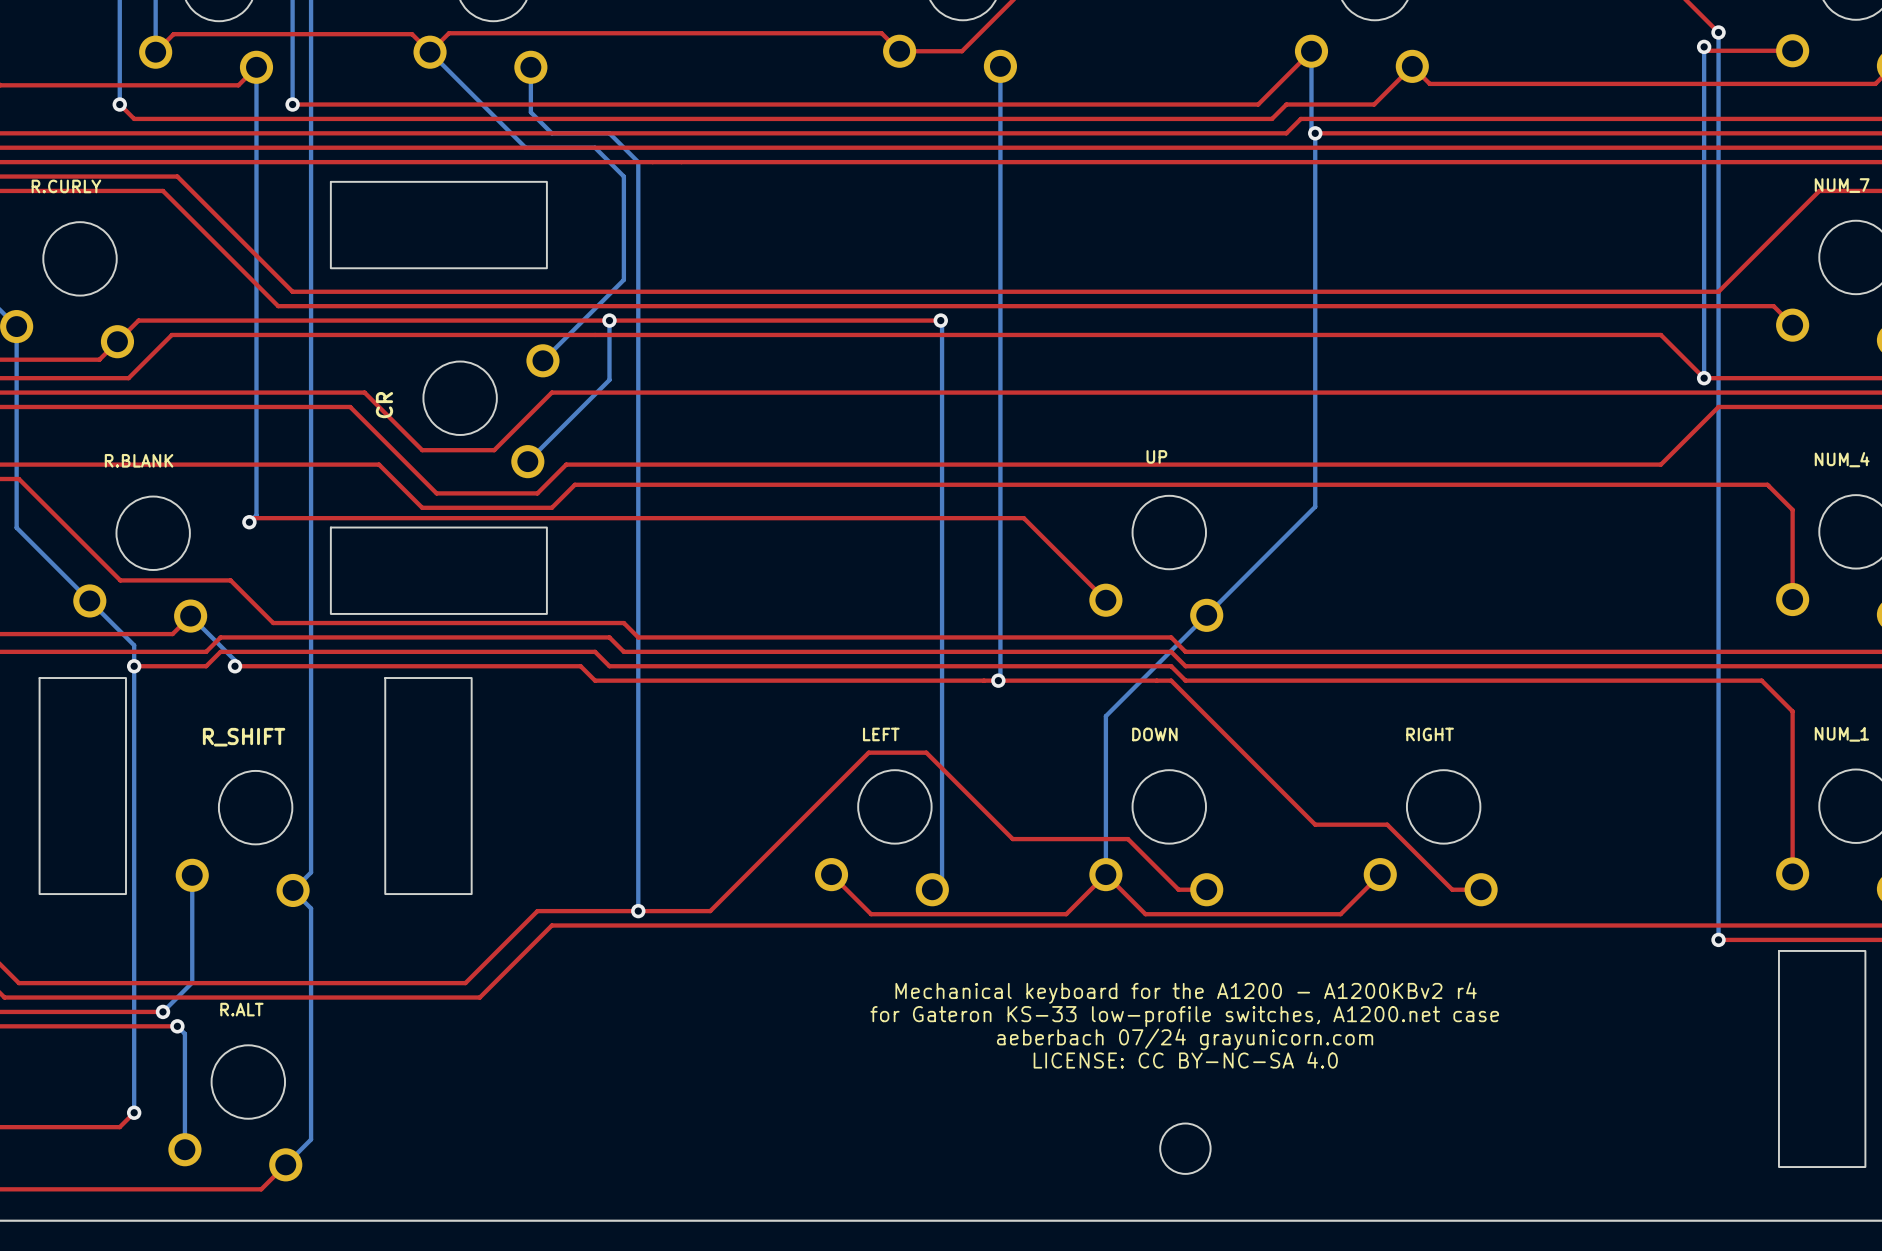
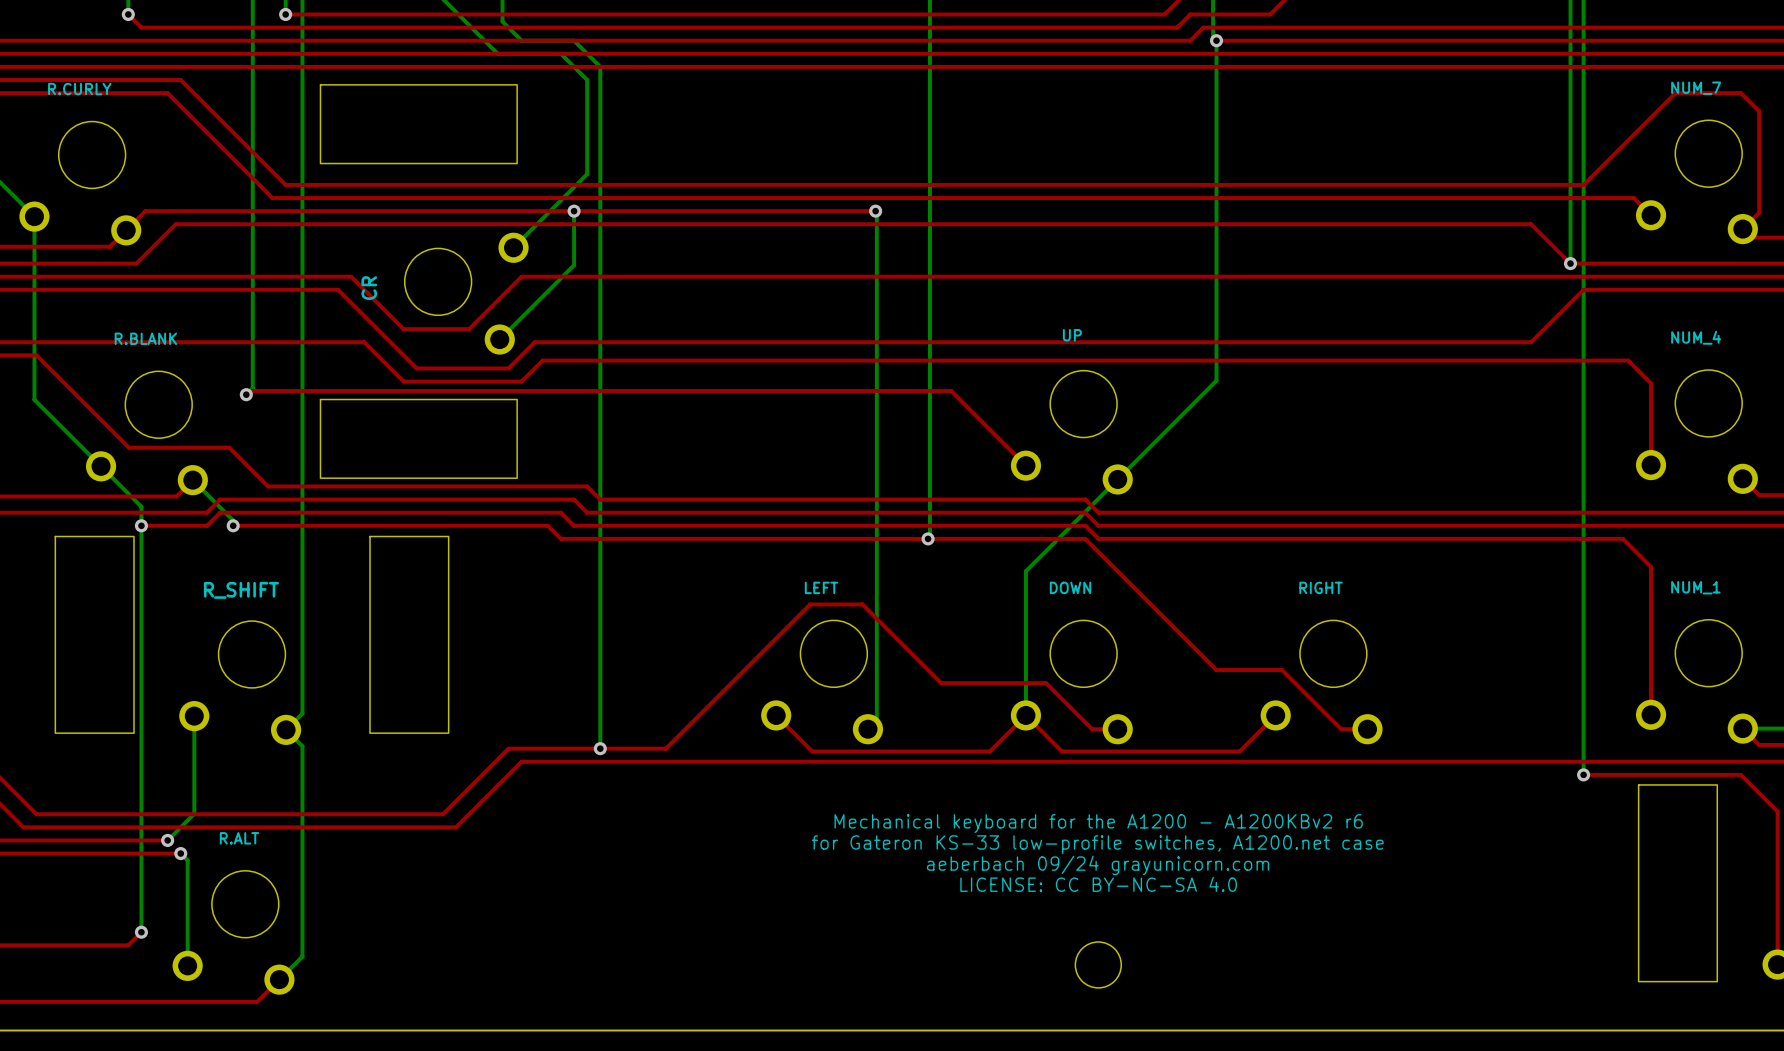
text: Mechanical keyboard for the A1200 - A1200KBv2 r4 (1186, 993) -> Mechanical keyboard for the A1200 - A1200KBv2 r6 (1098, 823)
text: aeberbach 07/24 grayunicorn.com (1185, 1039) -> aeberbach 09/24 grayunicorn.com (1098, 865)

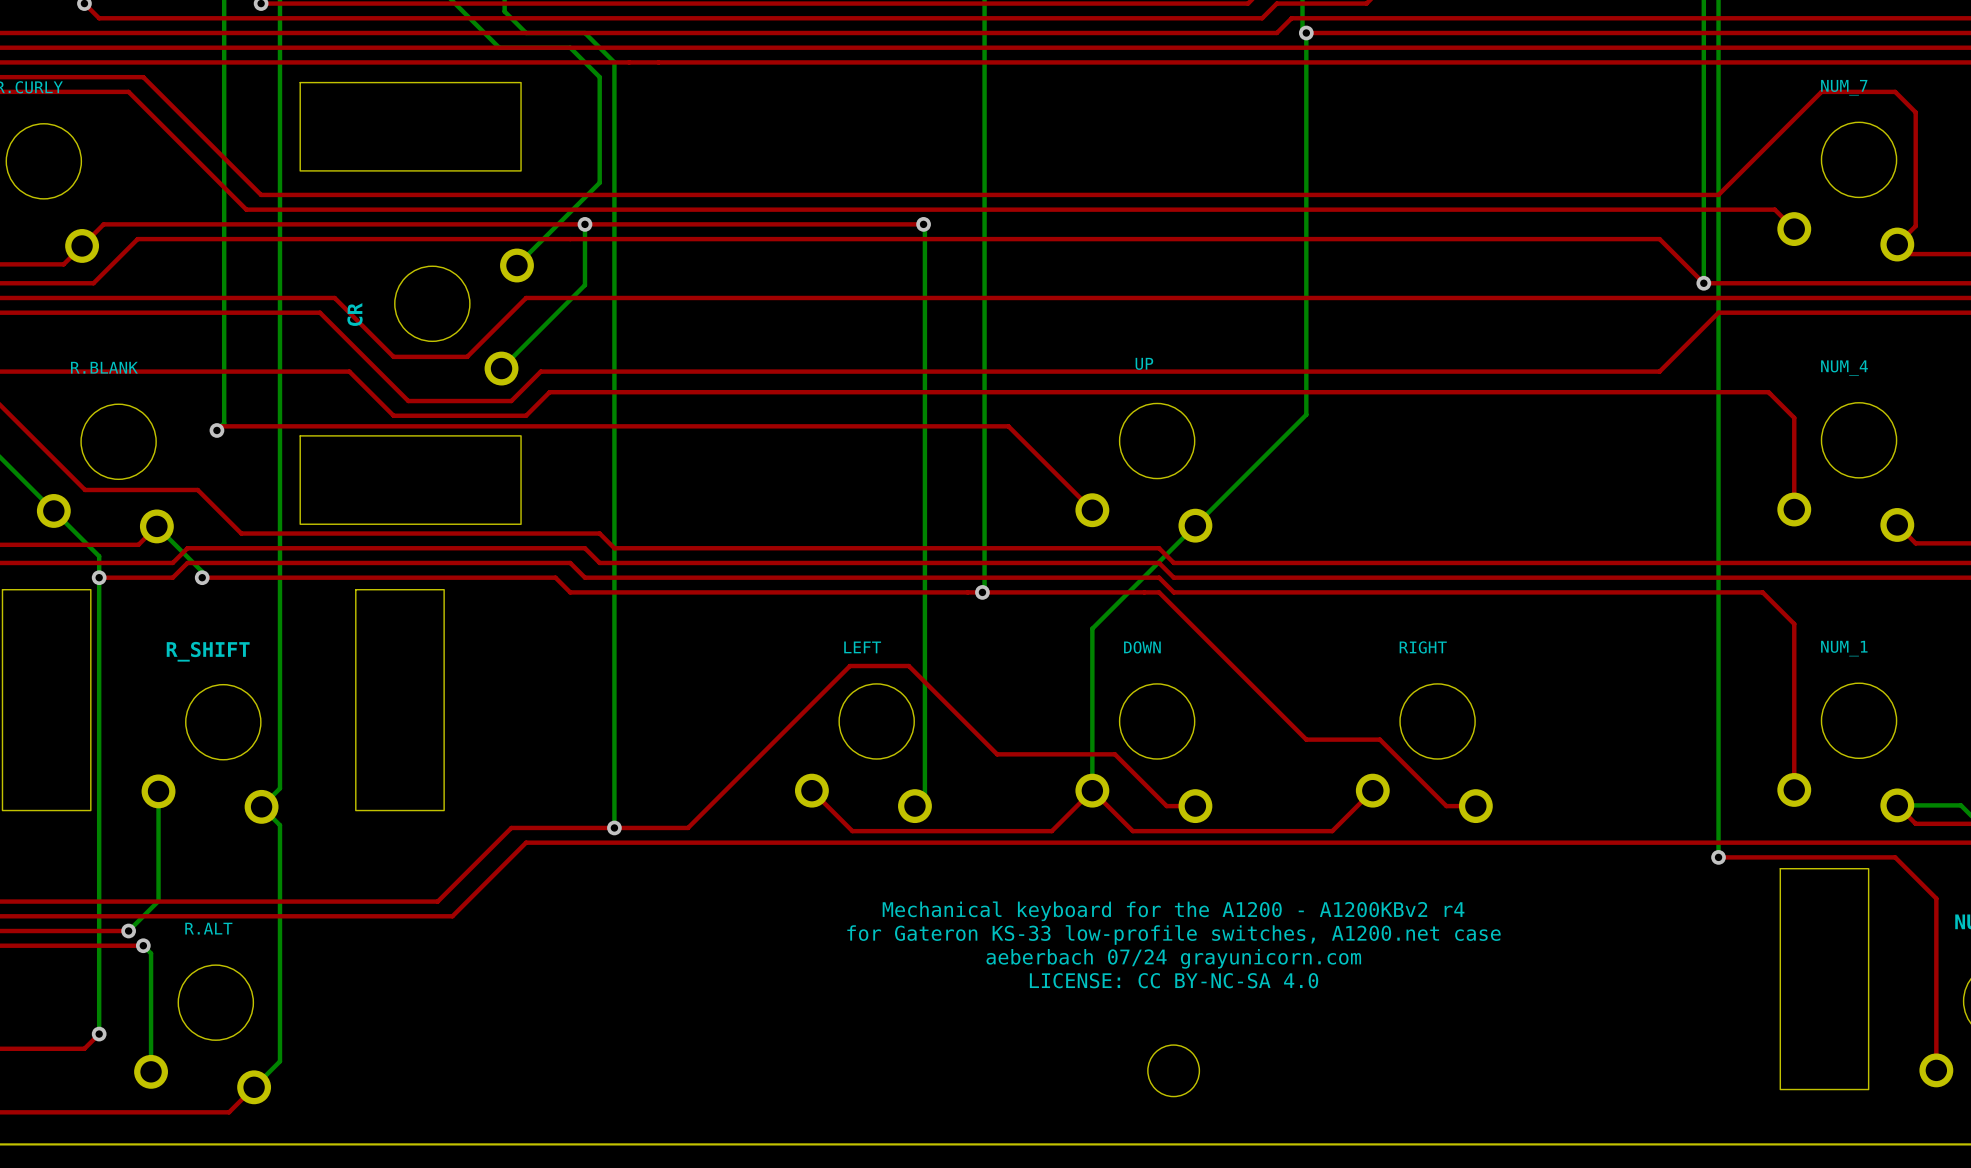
text: Mechanical keyboard for the A1200 - A1200KBv2 r6 (1098, 823) -> Mechanical keyboard for the A1200 - A1200KBv2 r4 (1173, 911)
text: aeberbach 09/24 grayunicorn.com (1098, 865) -> aeberbach 07/24 grayunicorn.com (1173, 958)

